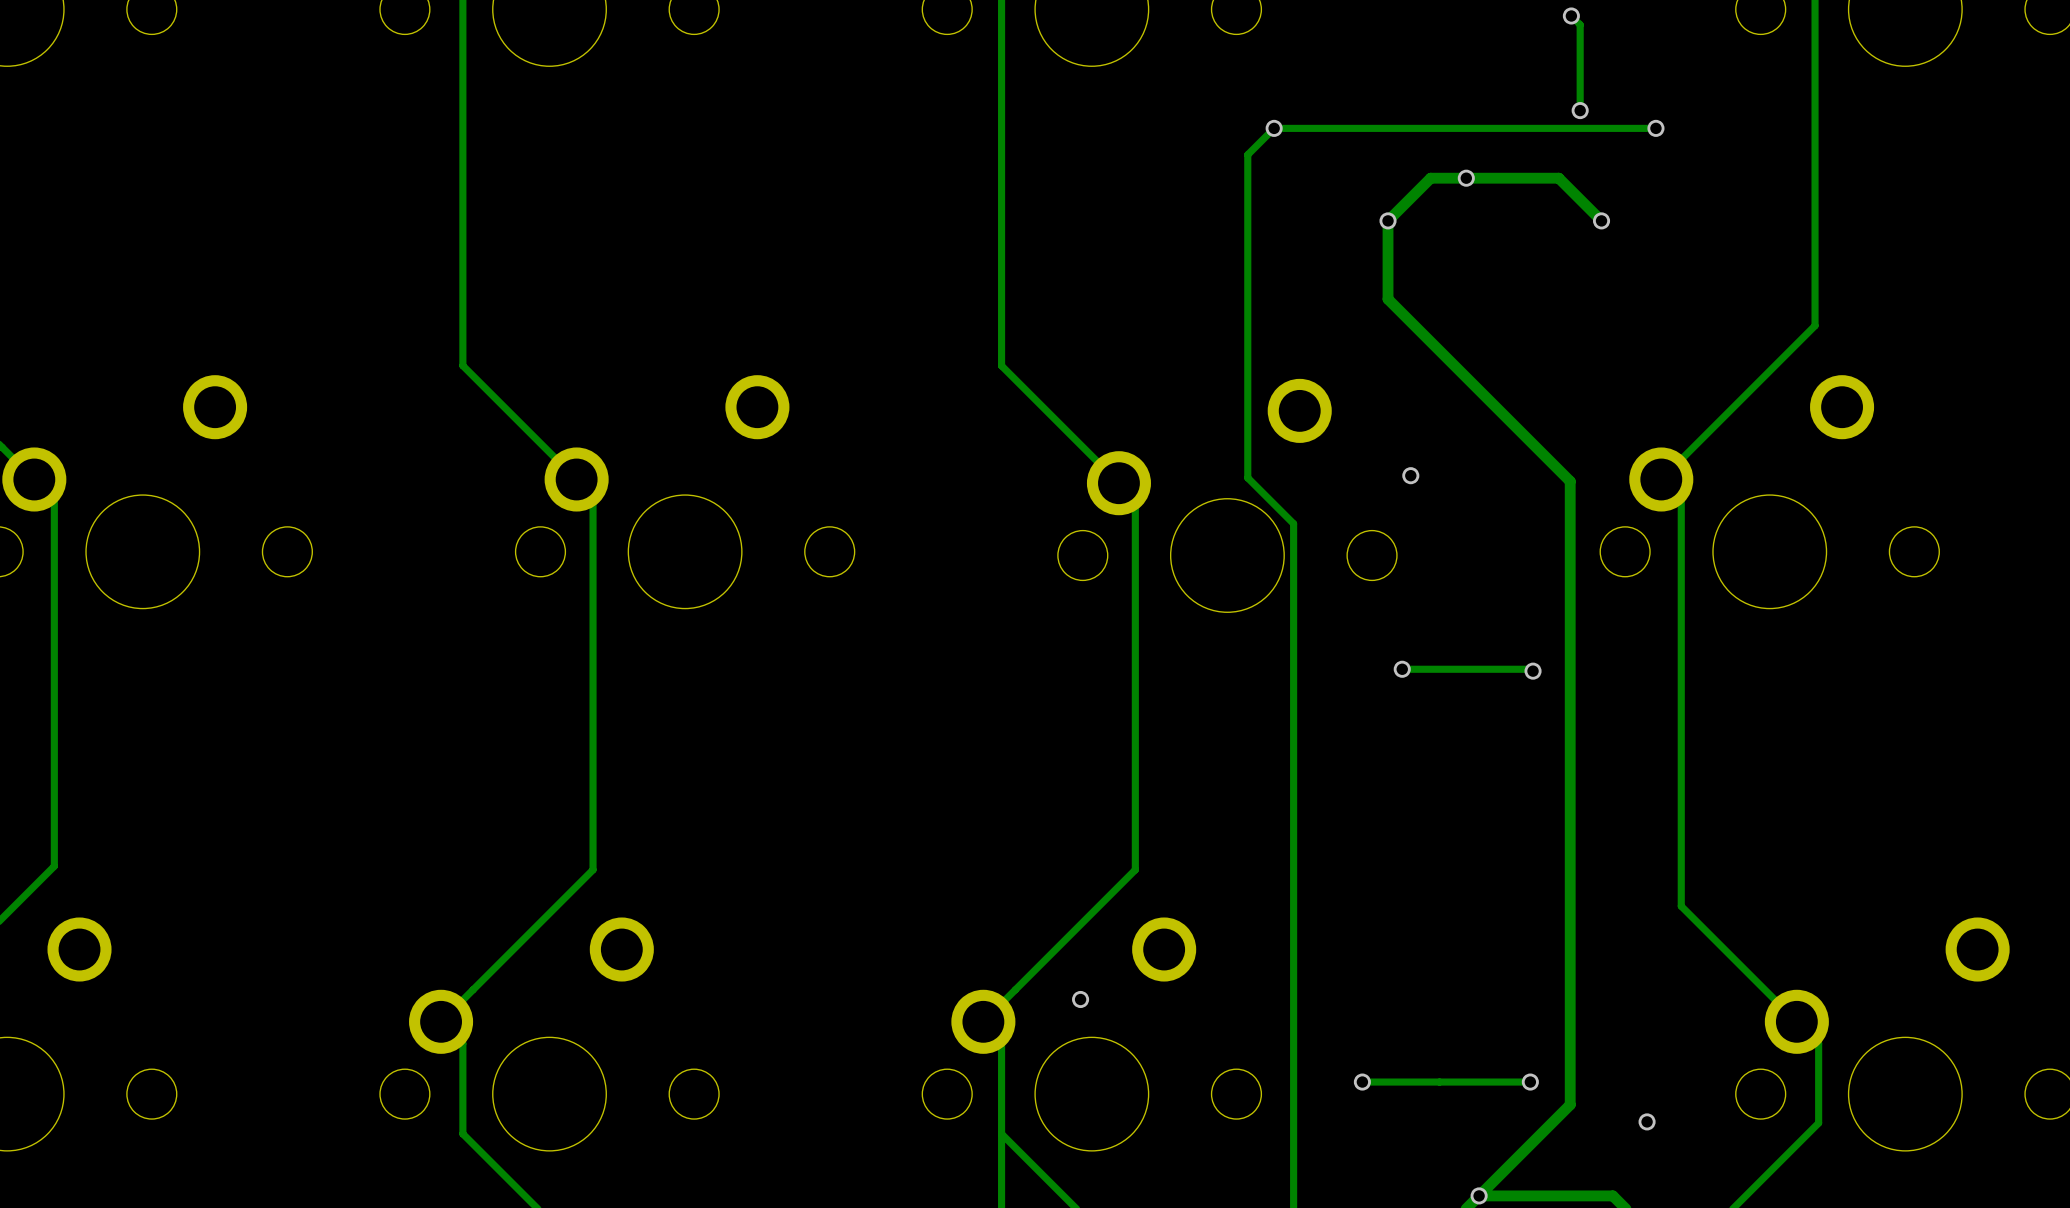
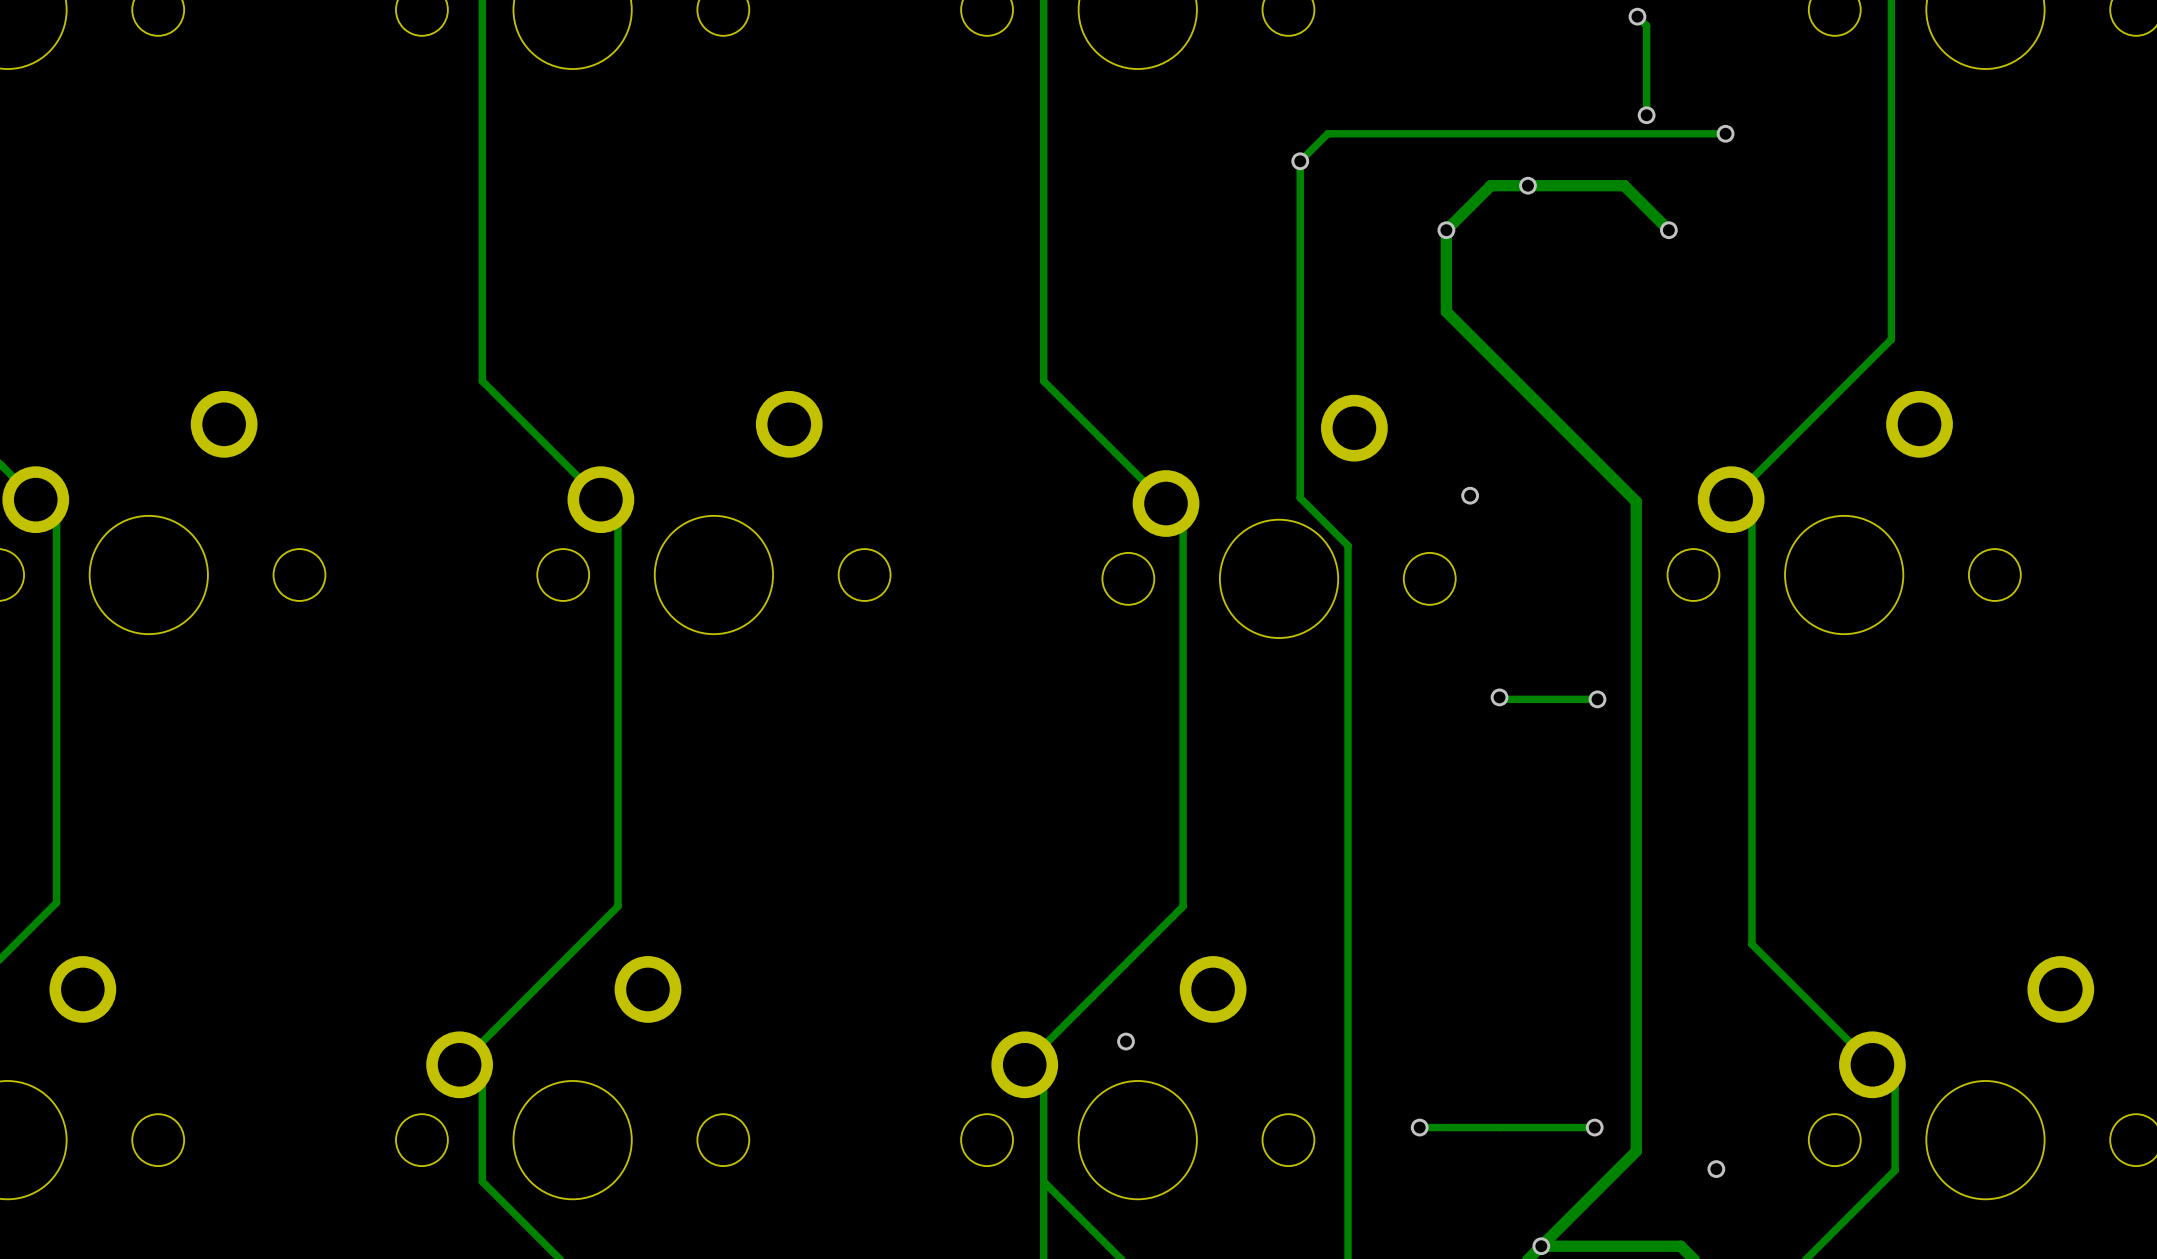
via position: (1274, 128) -> (1300, 161)
track: (1402, 669) (1531, 669) (1533, 671) -> (1499, 697) (1501, 699) (1597, 699)
via position: (1402, 669) -> (1499, 697)

